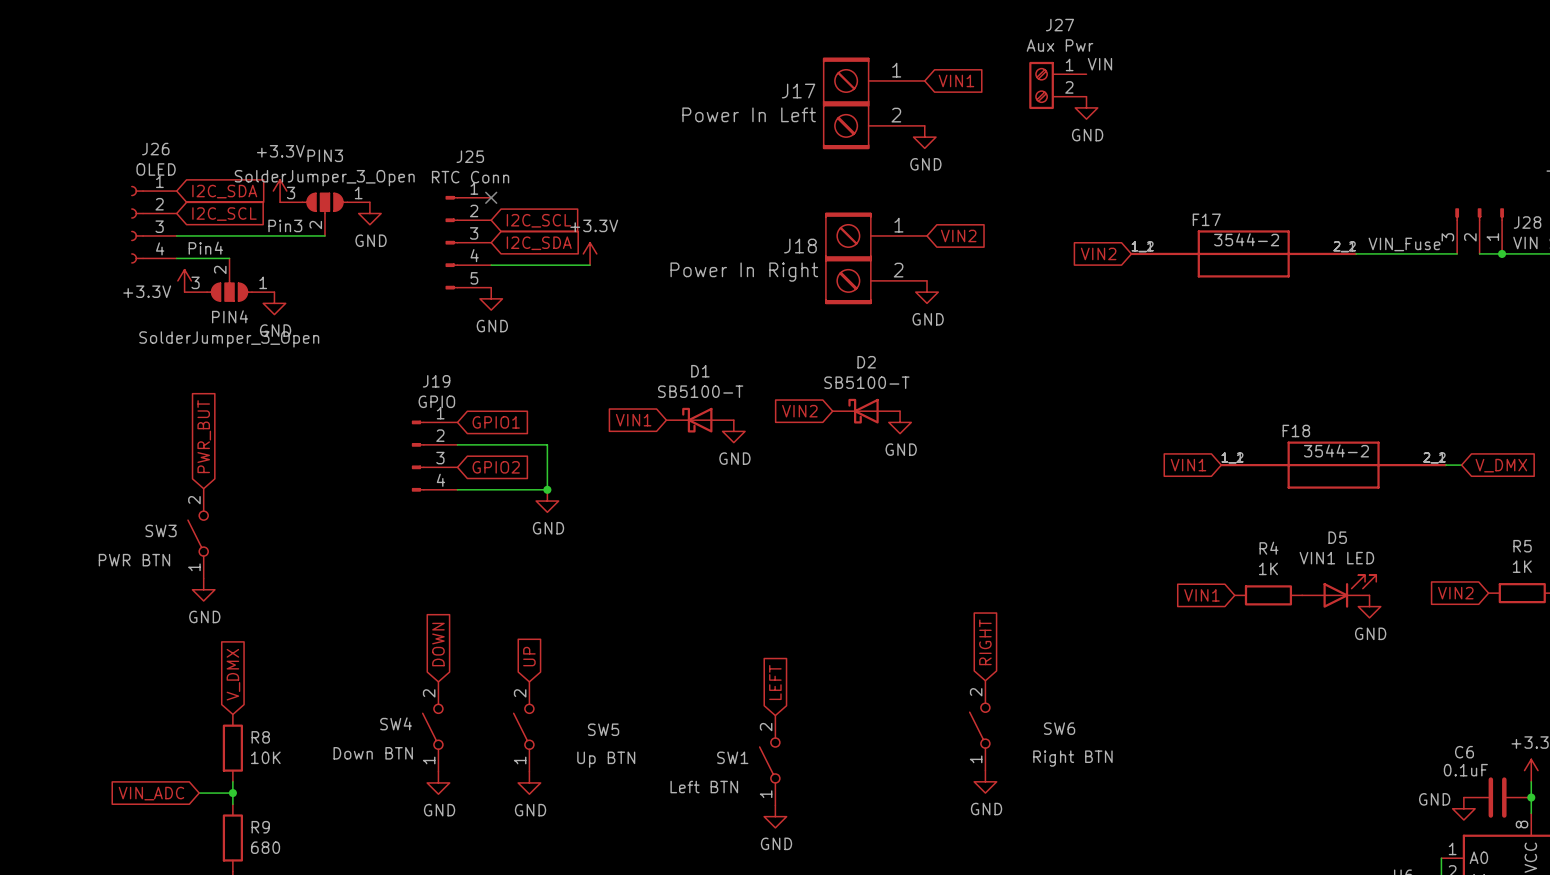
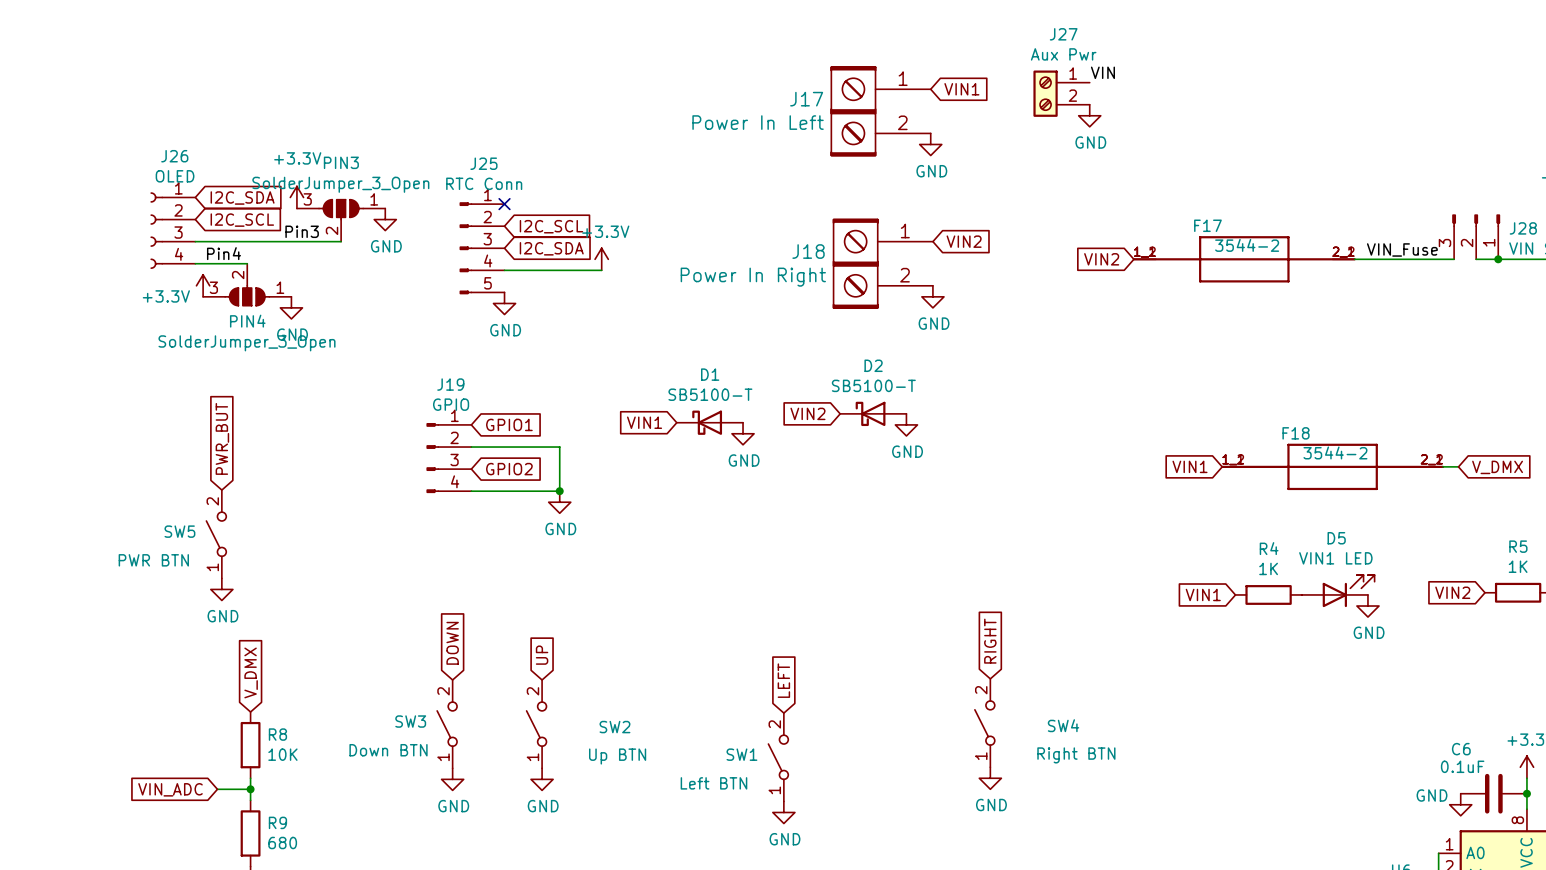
SW3 name: SW3 (161, 530) -> SW5 (179, 531)
SW4 name: SW4 (396, 723) -> SW3 (410, 721)
SW6 name: SW6 (1059, 728) -> SW4 (1063, 725)
SW5 name: SW5 (603, 729) -> SW2 (614, 727)

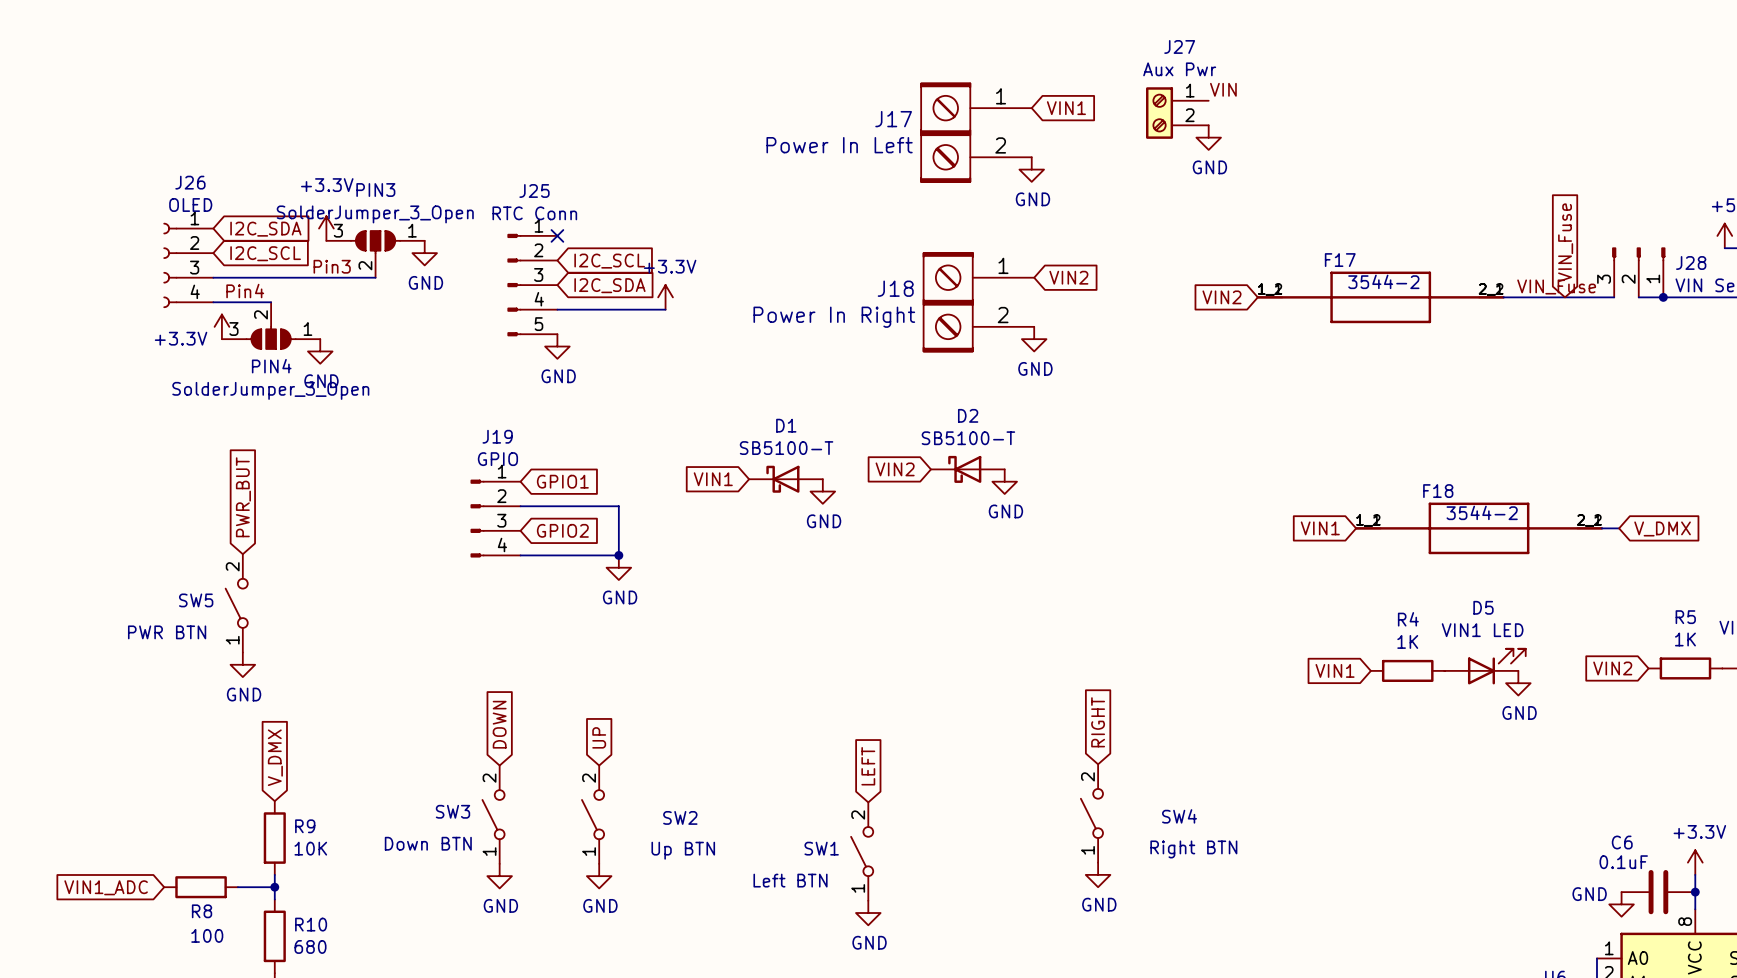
global label: none -> VIN_Fuse (1565, 242)
R8 name: R8 (277, 734) -> R9 (305, 826)
global label: VIN_ADC (170, 789) -> VIN1_ADC (106, 887)
R8: none -> 100 (201, 887)
R9 name: R9 (277, 822) -> R10 (311, 924)

